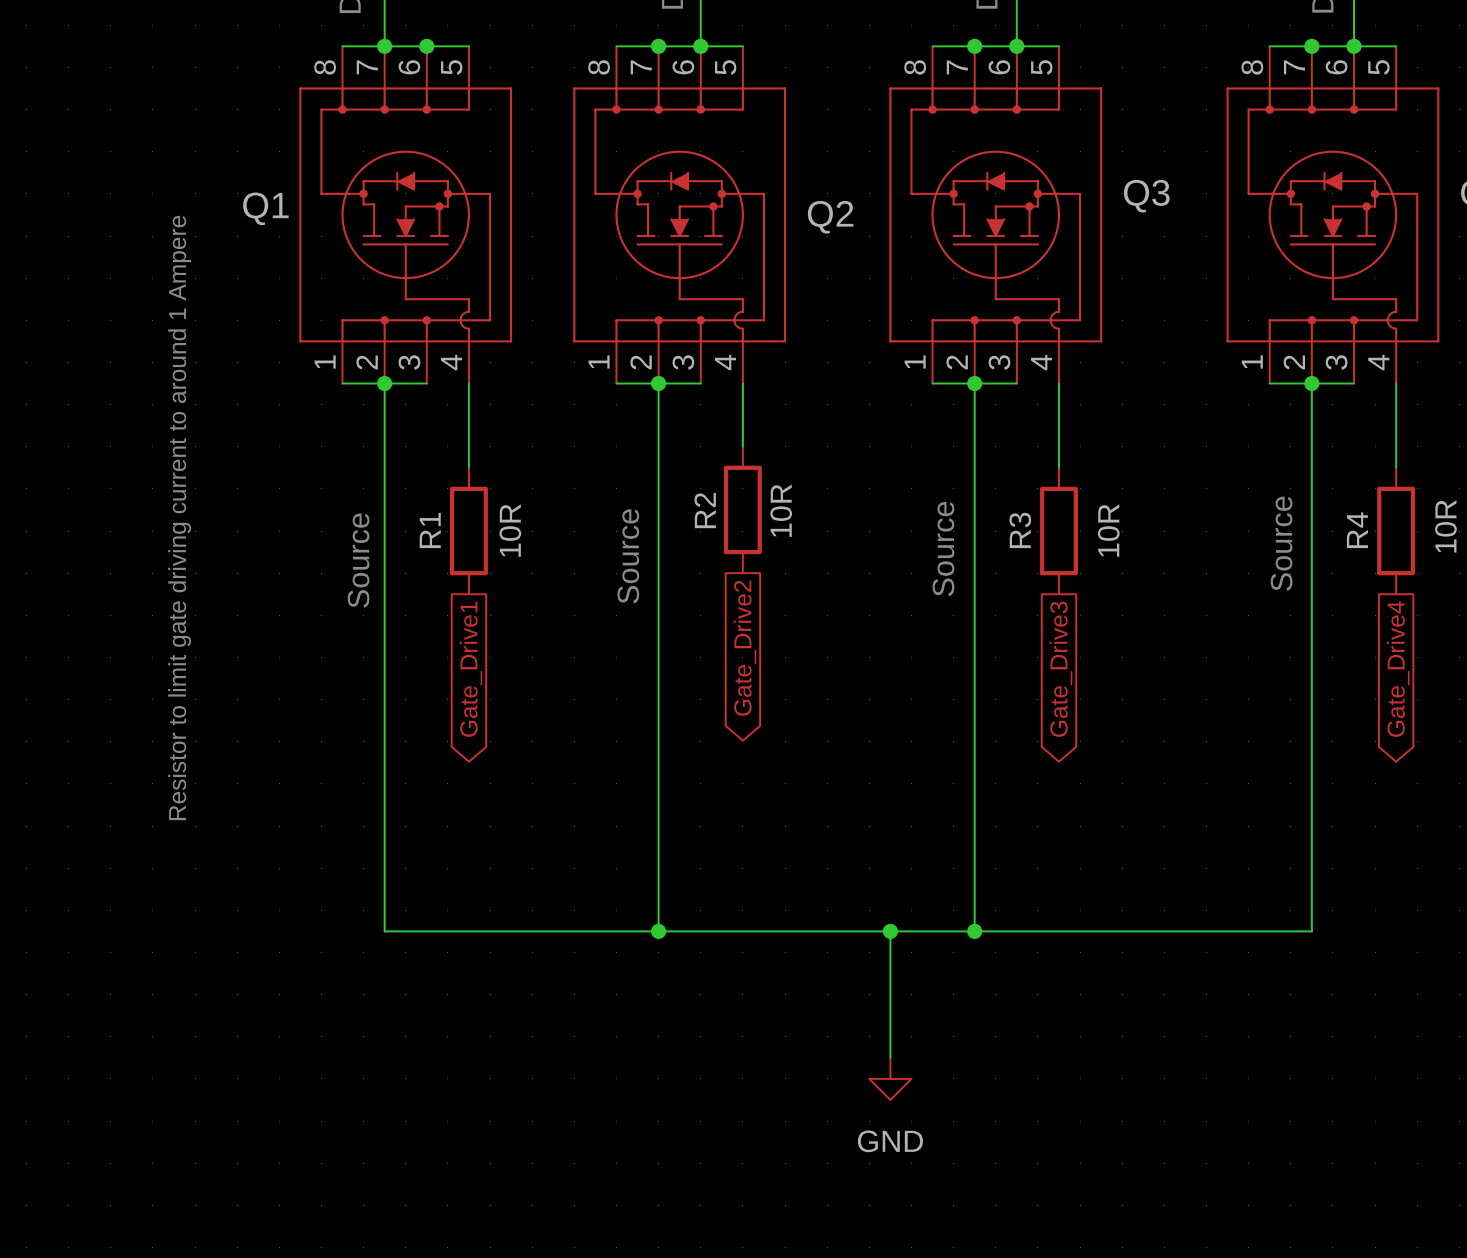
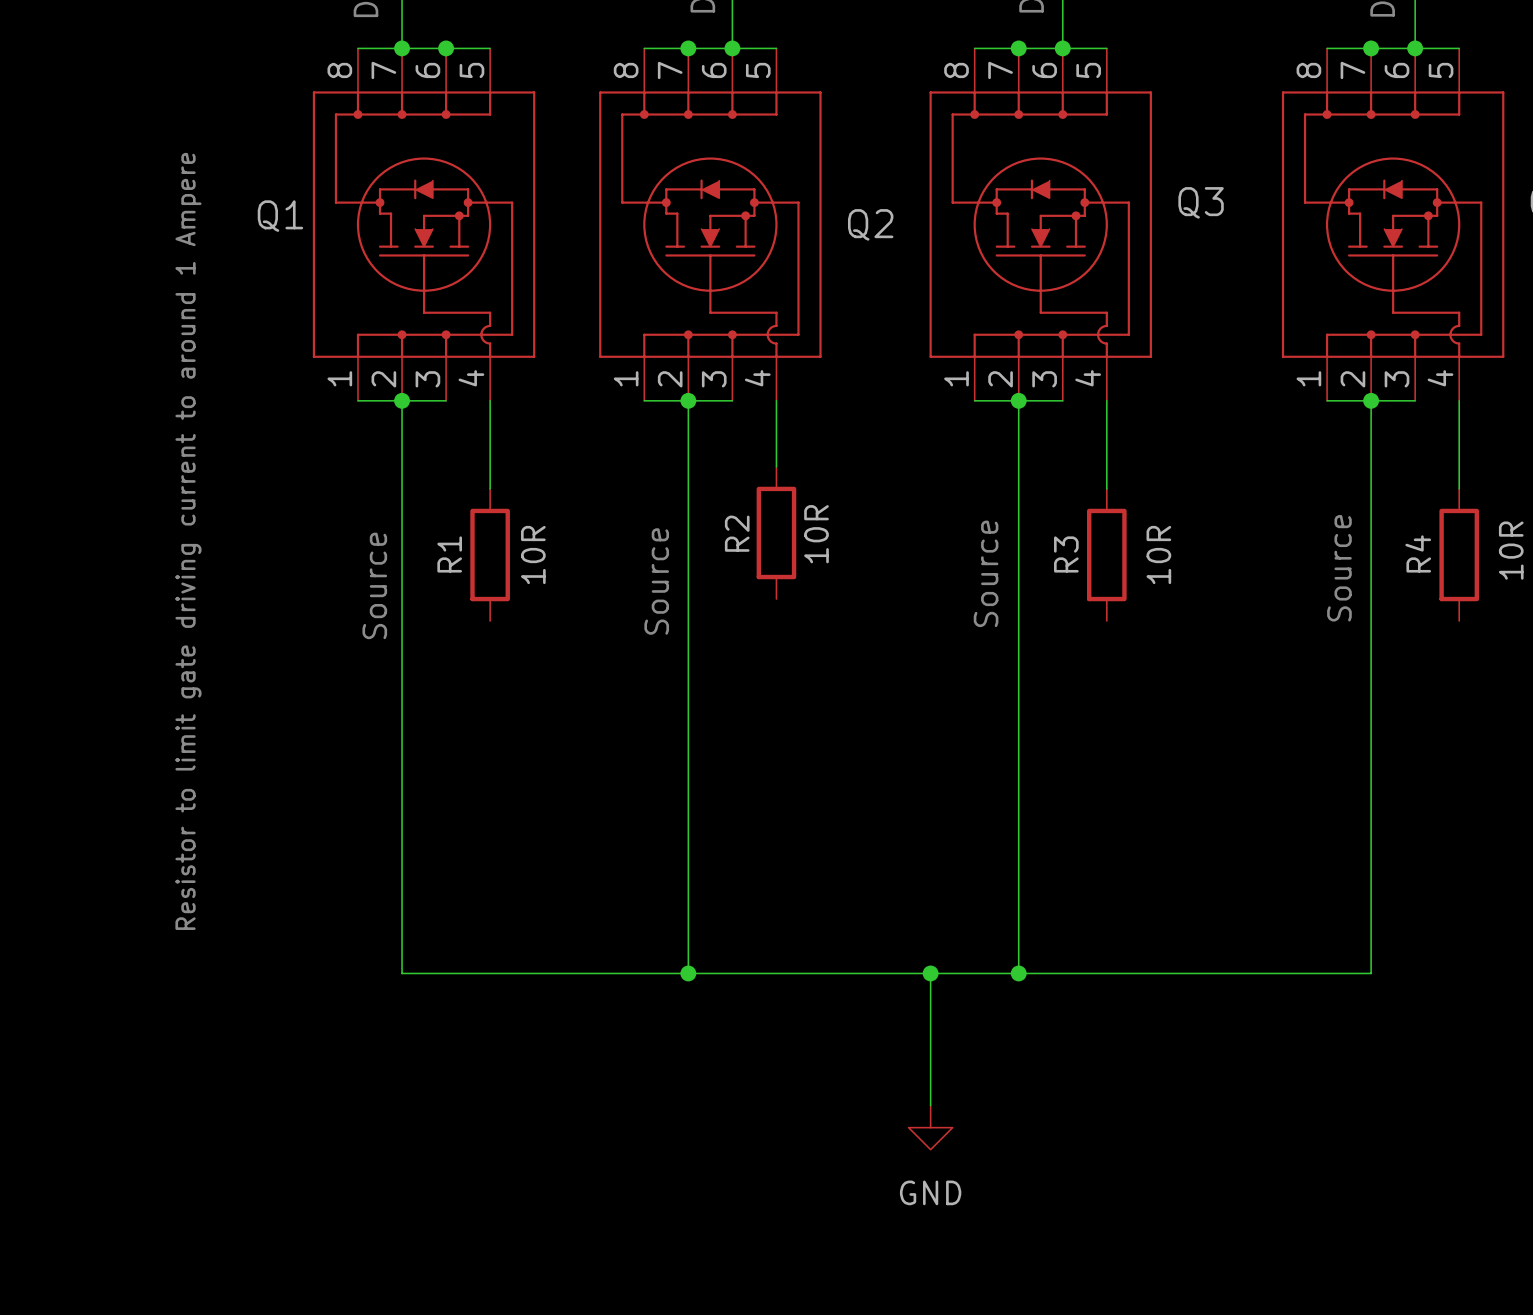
global label: Gate_Drive2 (744, 648) -> none
global label: Gate_Drive1 (470, 669) -> none
global label: Gate_Drive3 (1060, 669) -> none
global label: Gate_Drive4 (1398, 669) -> none

